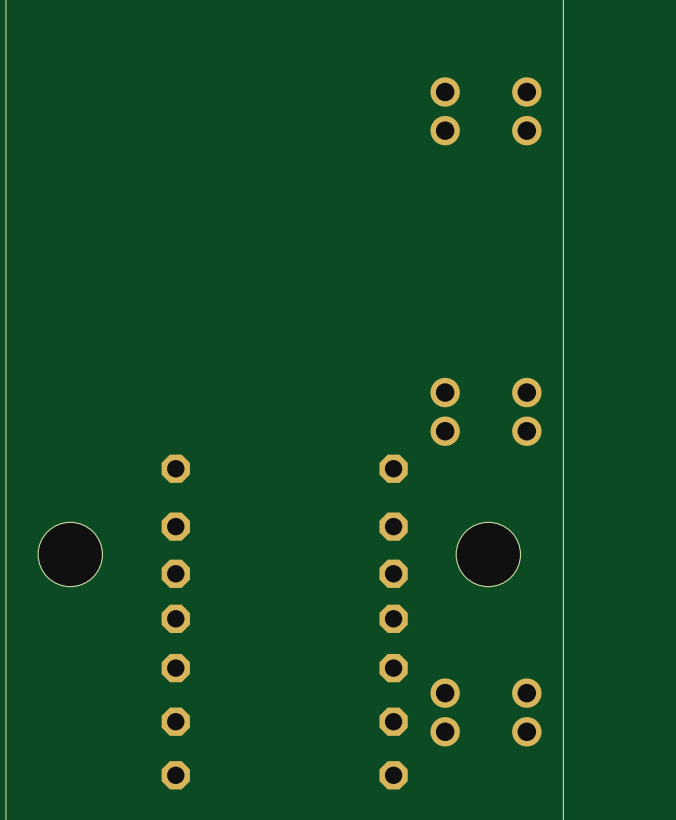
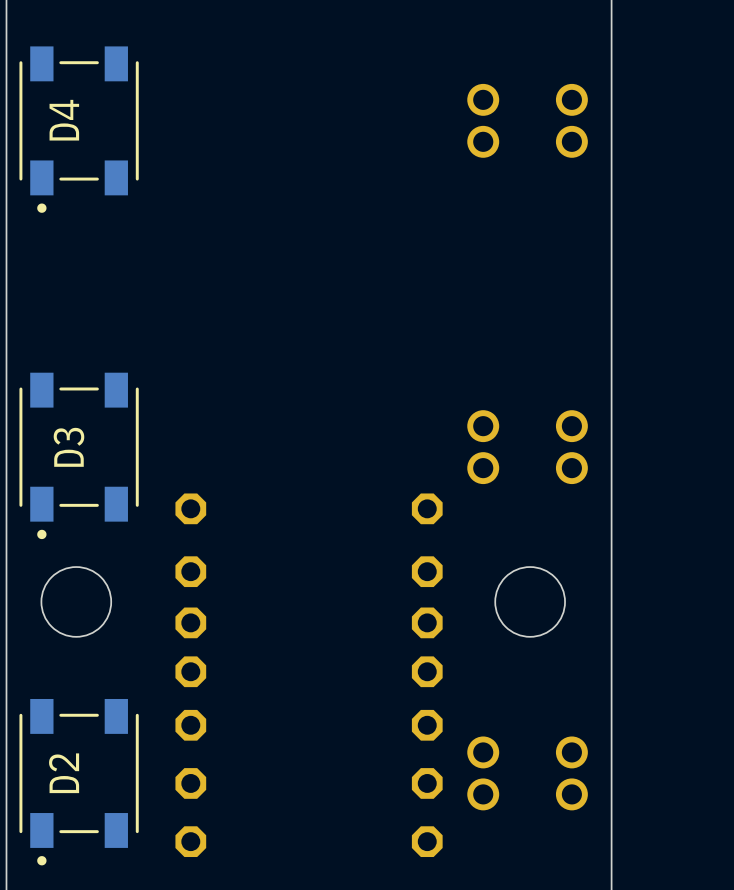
D4: none -> (79, 129)
D3: none -> (79, 455)
D2: none -> (79, 782)

